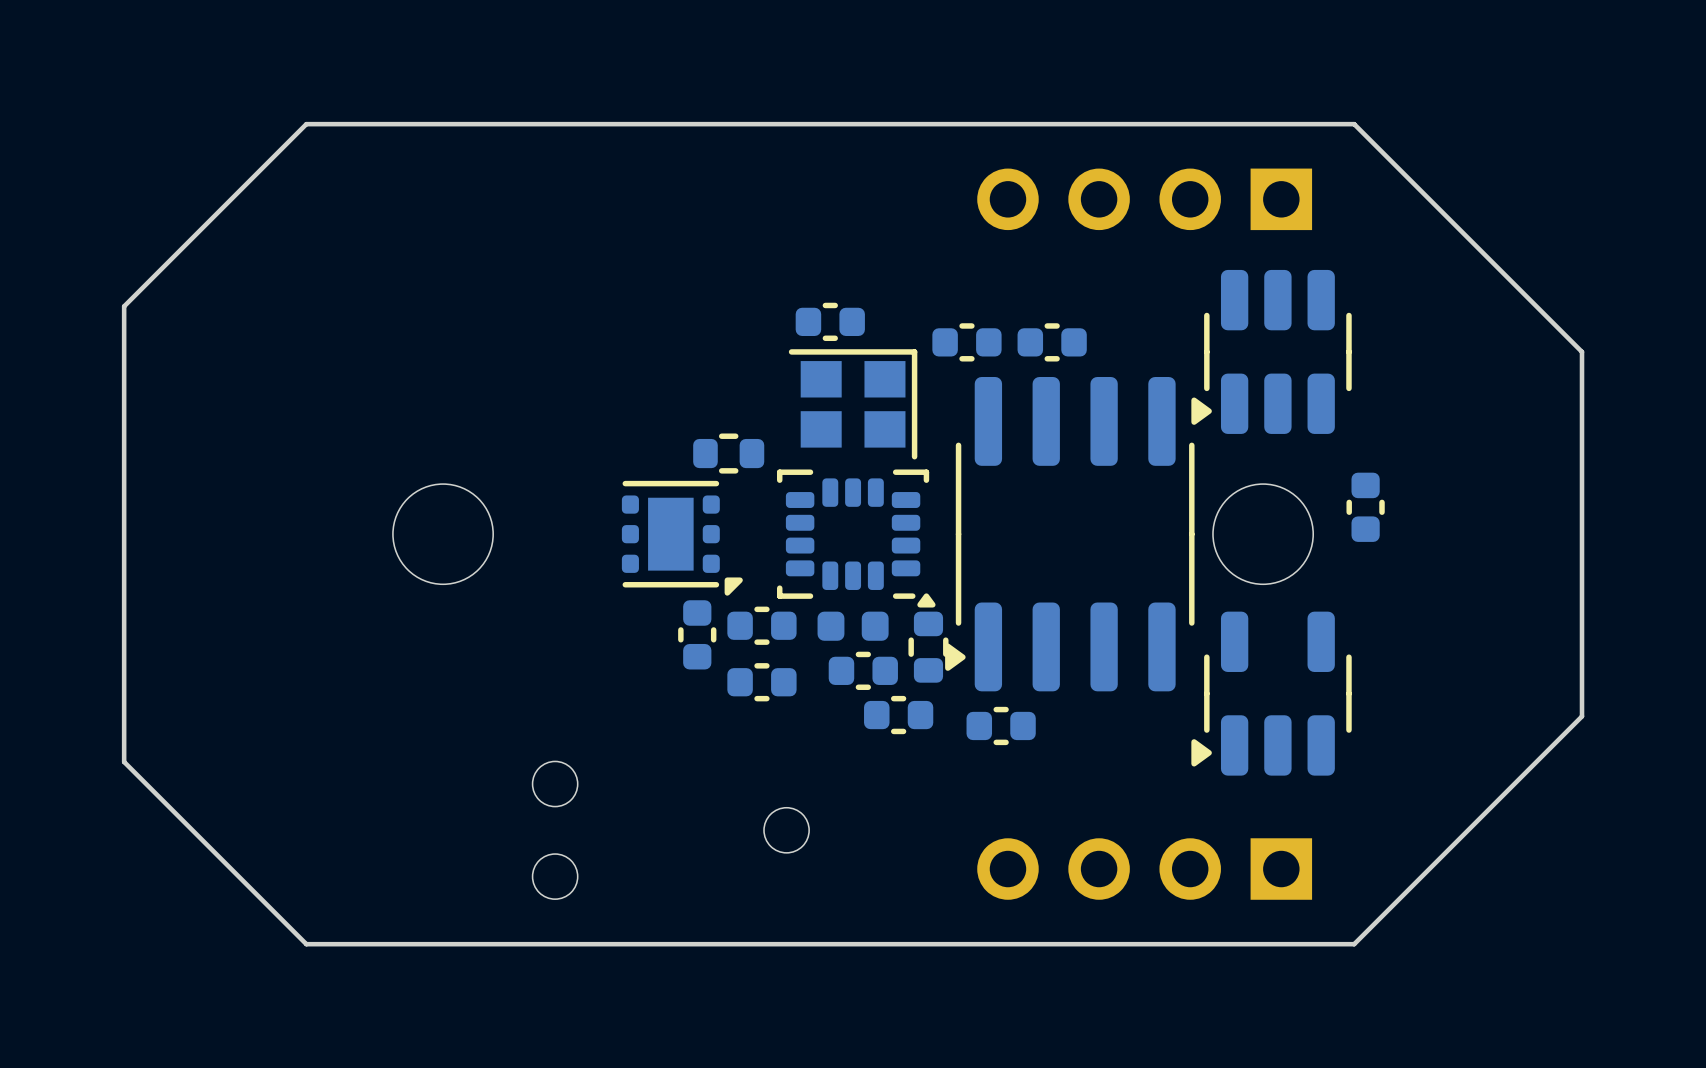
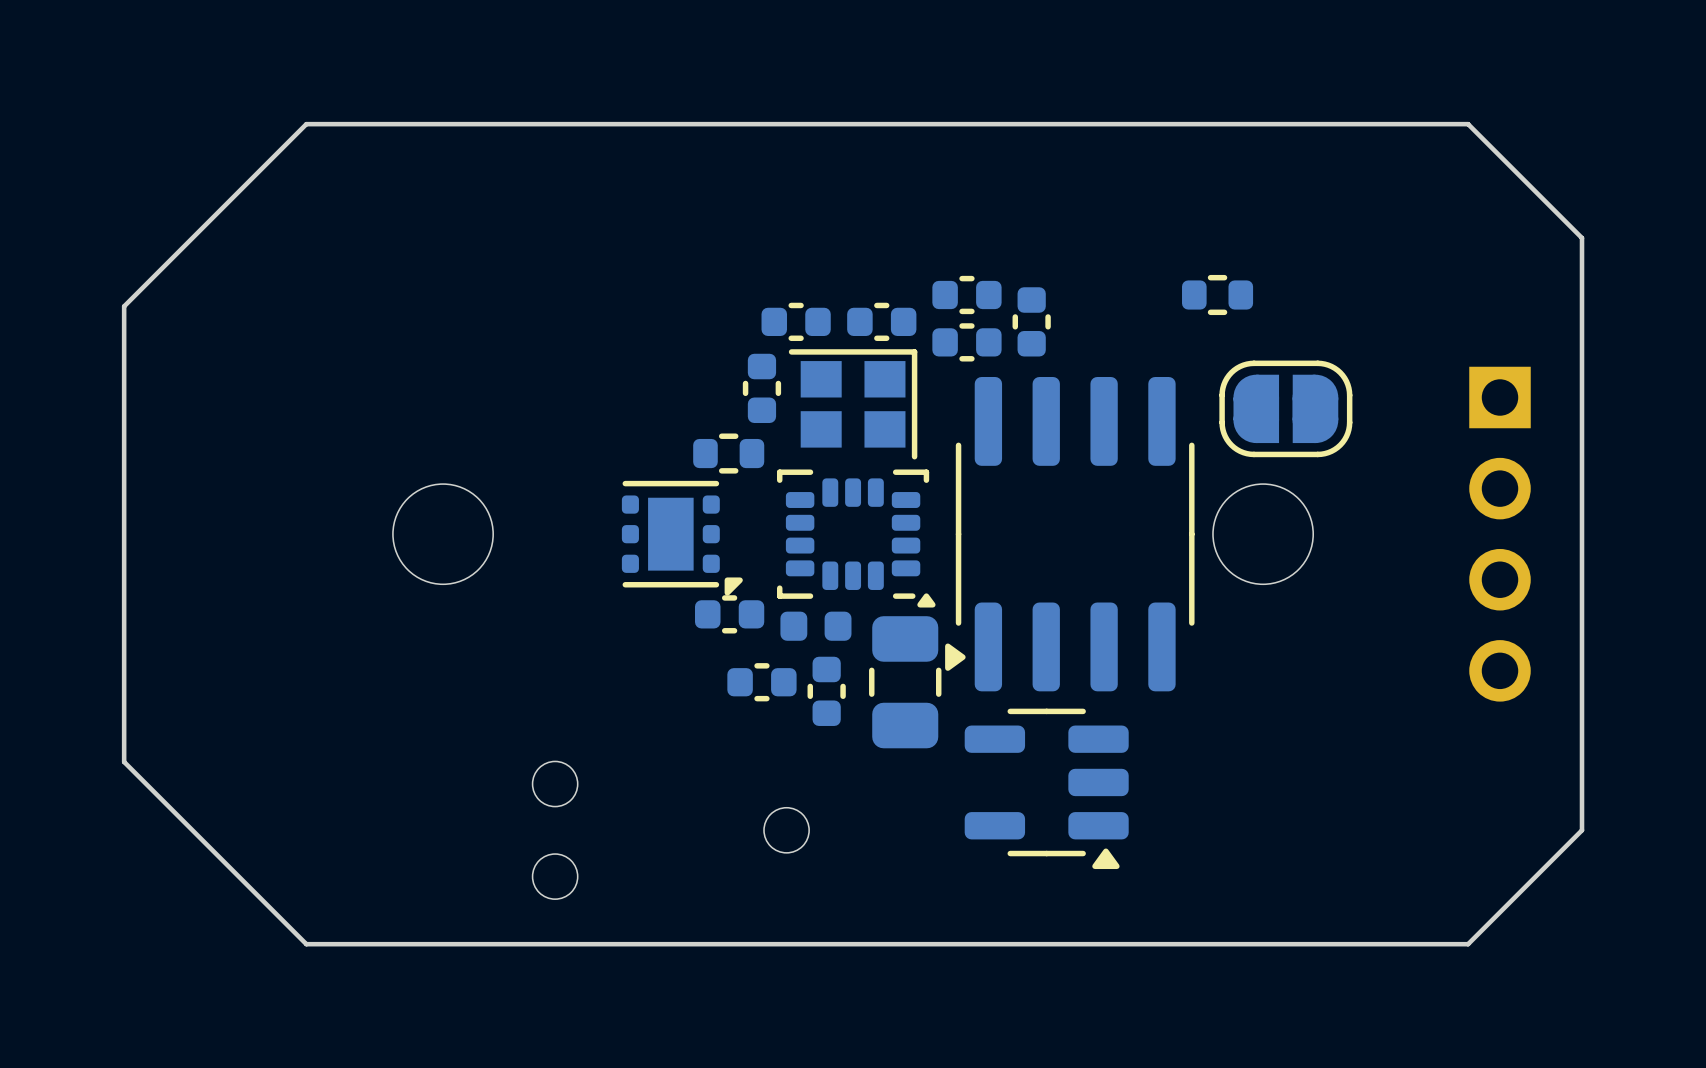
board edge: (1354, 124) (1582, 351) -> (1354, 124) (1468, 124) (1582, 238) (1582, 351)
part: (1144, 199) -> none
part: none -> (966, 294)
part: none -> (796, 321)
part: (830, 321) -> none
part: none -> (881, 321)
part rotation: 0° (1052, 342) -> 90° clockwise (1031, 321)
part: (1271, 351) -> none
part: none -> (761, 388)
part: none -> (1285, 408)
part: (1365, 507) -> none
part: none -> (1500, 534)
part: none -> (729, 614)
part: (761, 625) -> none
part position: (853, 626) -> (815, 626)
part: (697, 634) -> none
part rotation: 0° (928, 647) -> 90° clockwise (1217, 294)
part position: (928, 647) -> (1217, 294)
part: (863, 670) -> none
part: none -> (905, 682)
part: none -> (826, 691)
part rotation: 0° (1271, 693) -> 90° counterclockwise (1046, 788)
part position: (1271, 693) -> (1046, 788)
part: (898, 715) -> none
board edge: (1582, 716) (1354, 944) -> (1582, 716) (1582, 830) (1468, 944) (1354, 944)
part: (1001, 725) -> none
part: (1144, 869) -> none

